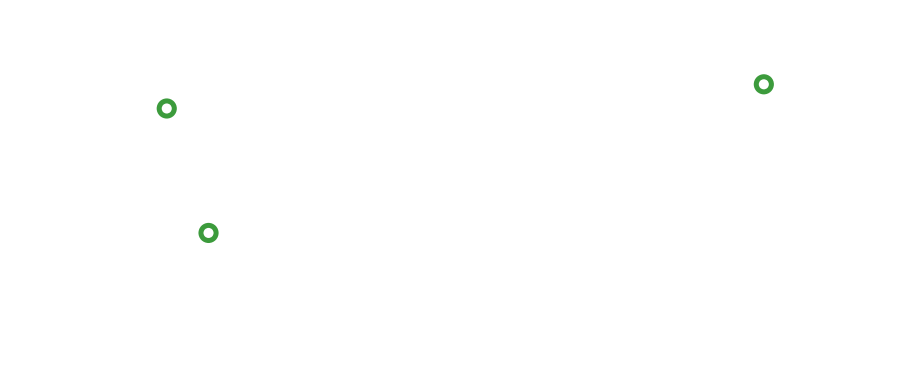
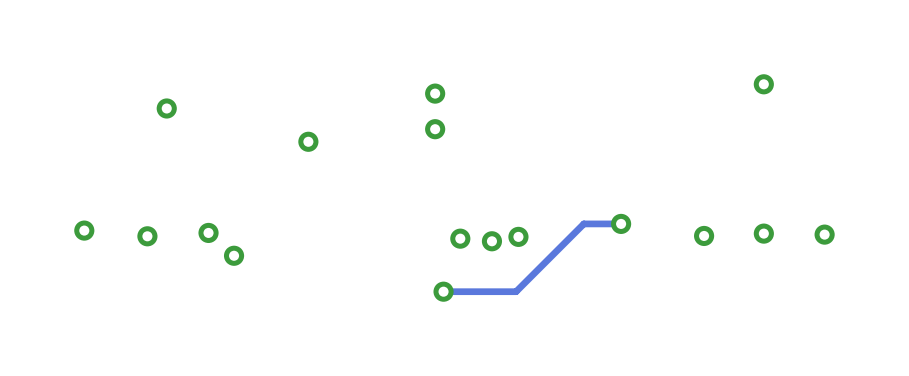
via: none -> (435, 93)
via: none -> (435, 129)
via: none -> (308, 141)
track: none -> (621, 223) (583, 223) (516, 291) (443, 291)
via: none -> (621, 223)
via: none -> (84, 230)
via: none -> (763, 233)
via: none -> (824, 234)
via: none -> (704, 235)
via: none -> (147, 236)
via: none -> (518, 236)
via: none -> (460, 238)
via: none -> (491, 241)
via: none -> (234, 255)
via: none -> (443, 291)

